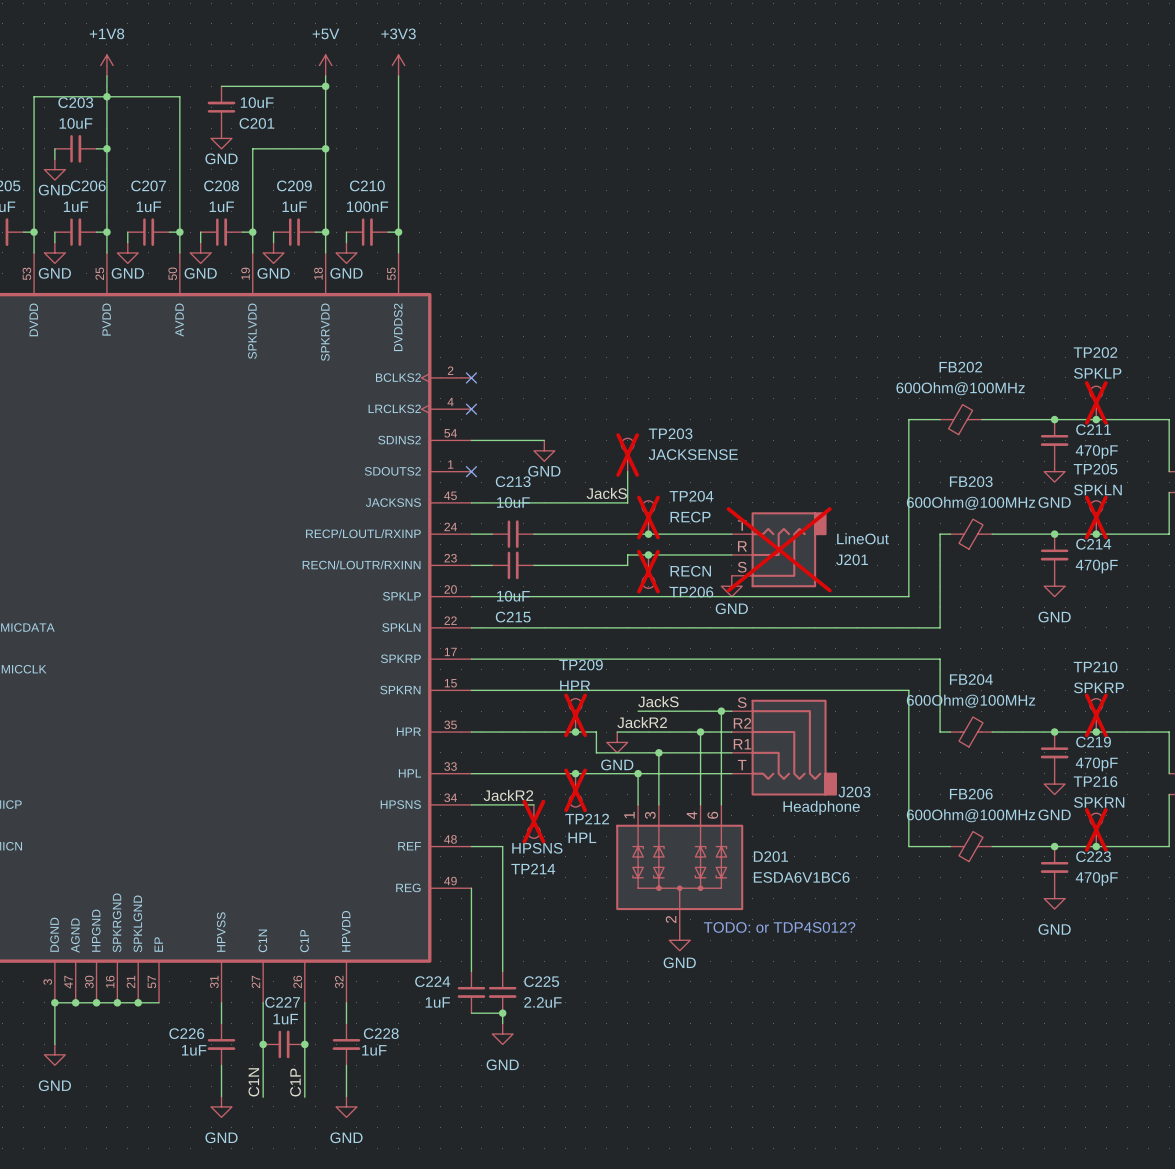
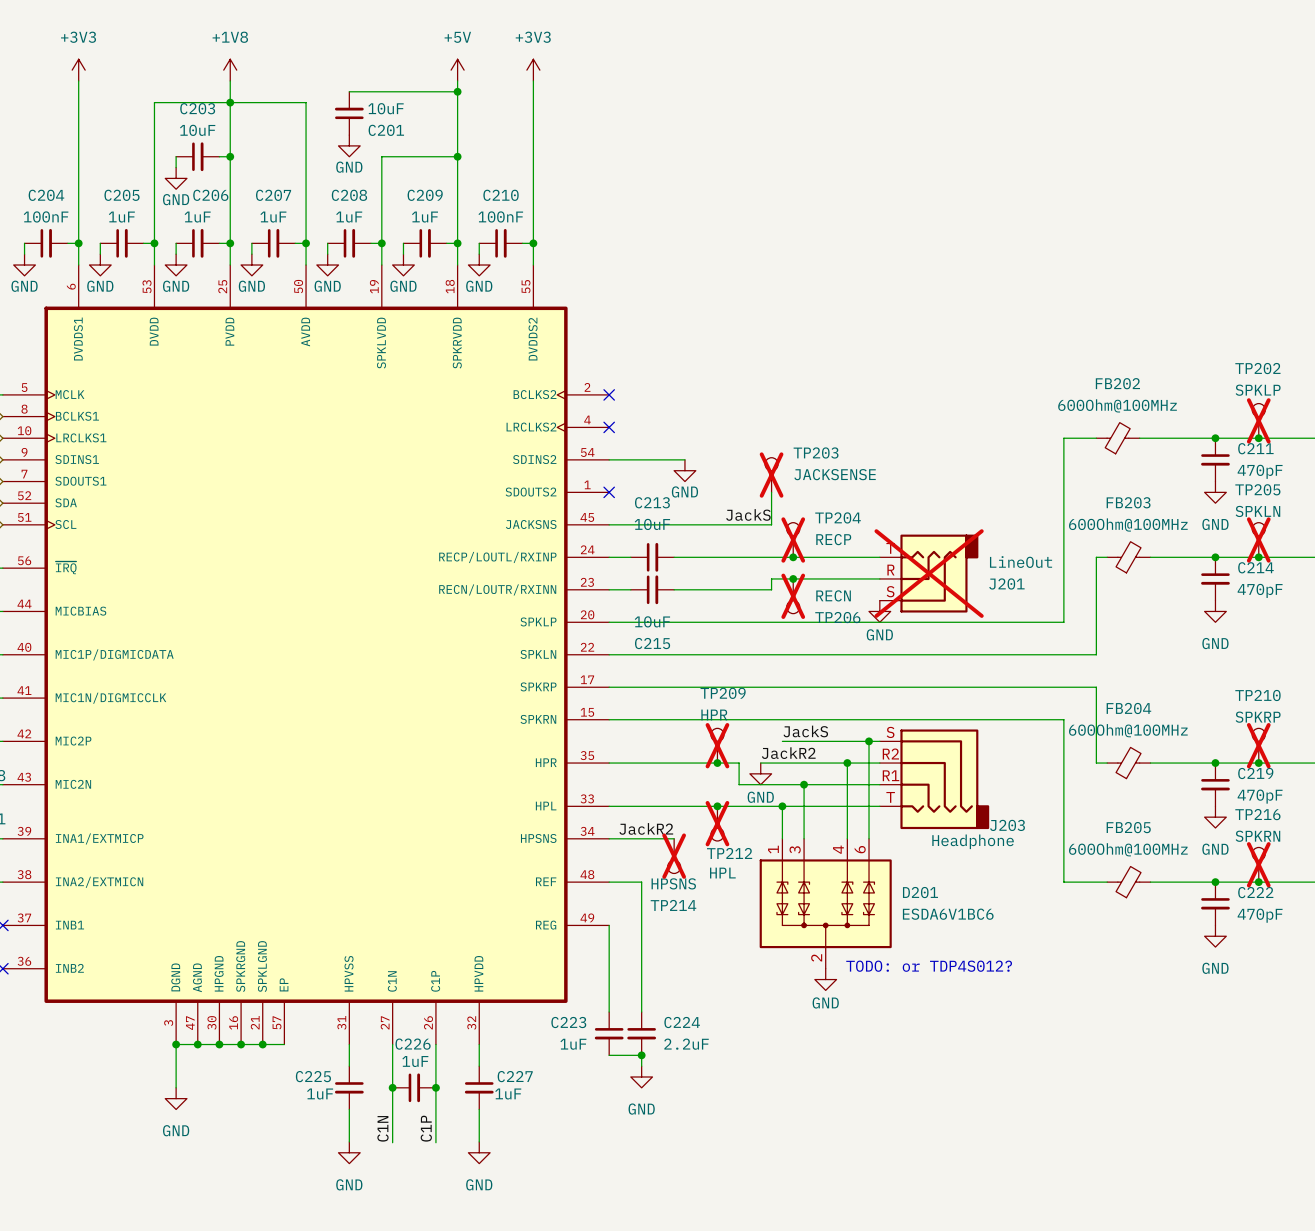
FB206 name: FB206 (971, 794) -> FB205 (1128, 827)
C223 name: C223 (1093, 856) -> C222 (1255, 892)
C224 name: C224 (432, 981) -> C223 (568, 1022)
C225 name: C225 (541, 981) -> C224 (682, 1022)
C227 name: C227 (282, 1002) -> C226 (413, 1044)
C226 name: C226 (186, 1033) -> C225 (313, 1076)
C228 name: C228 (381, 1033) -> C227 (515, 1076)

